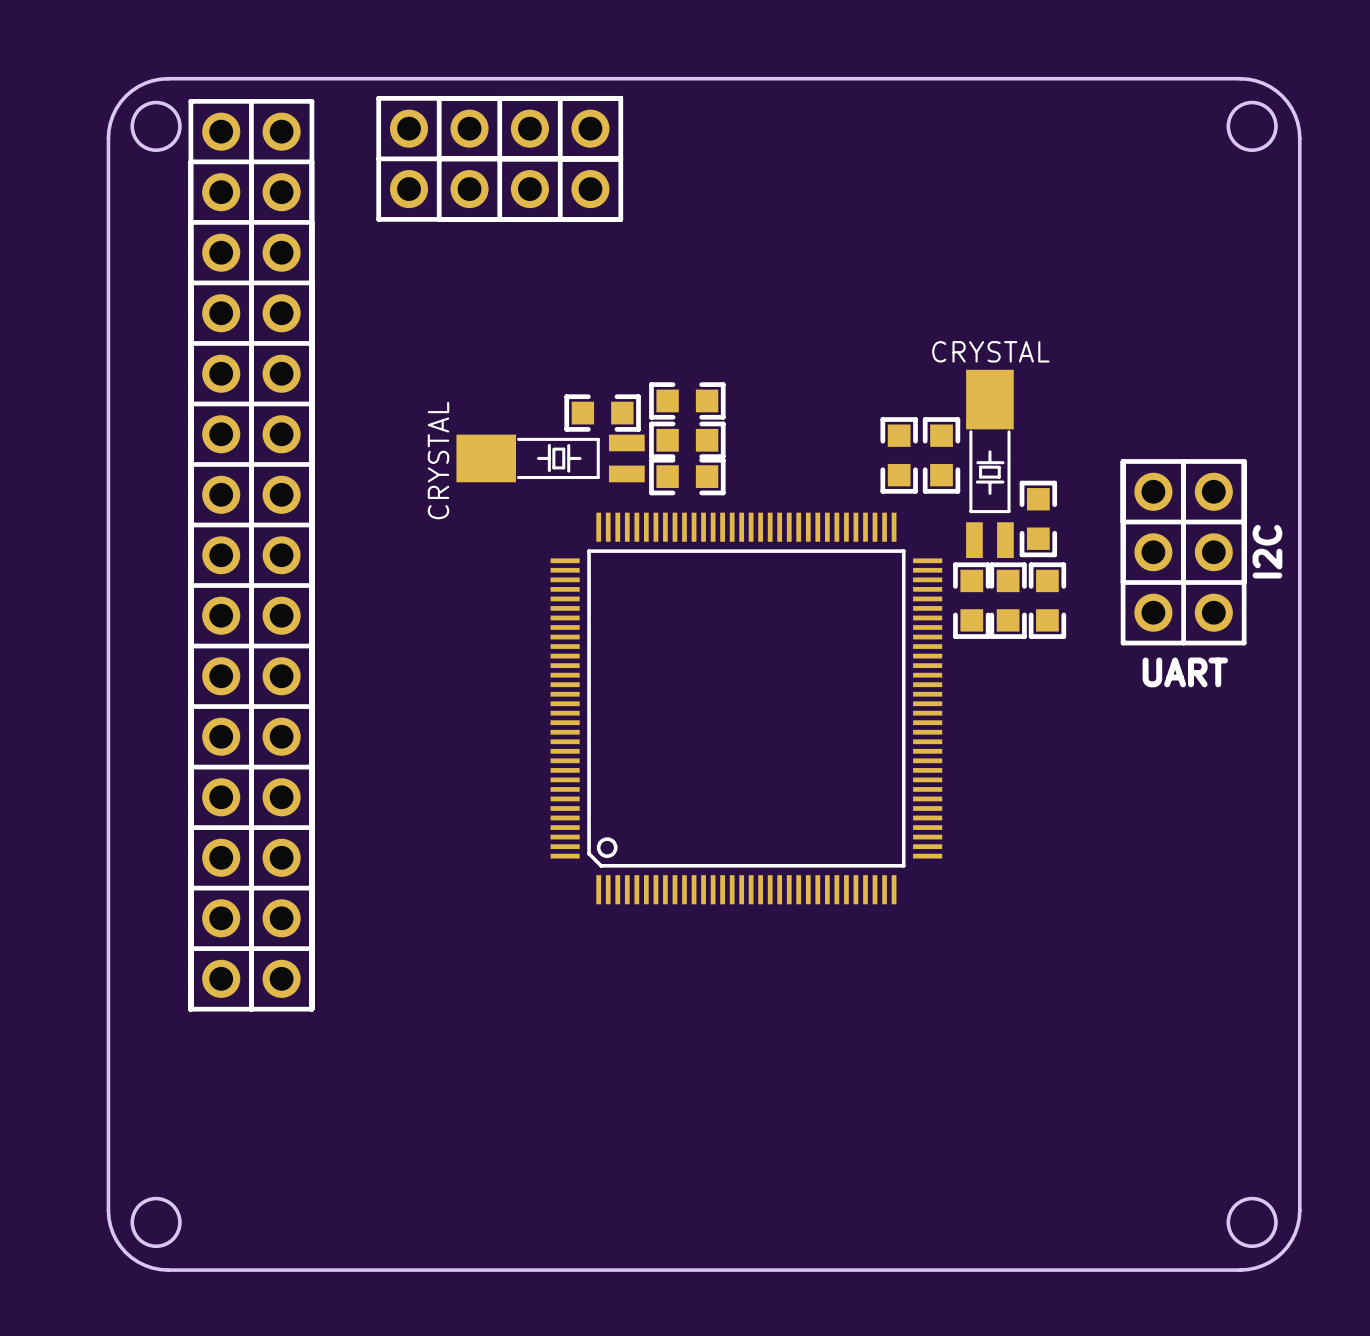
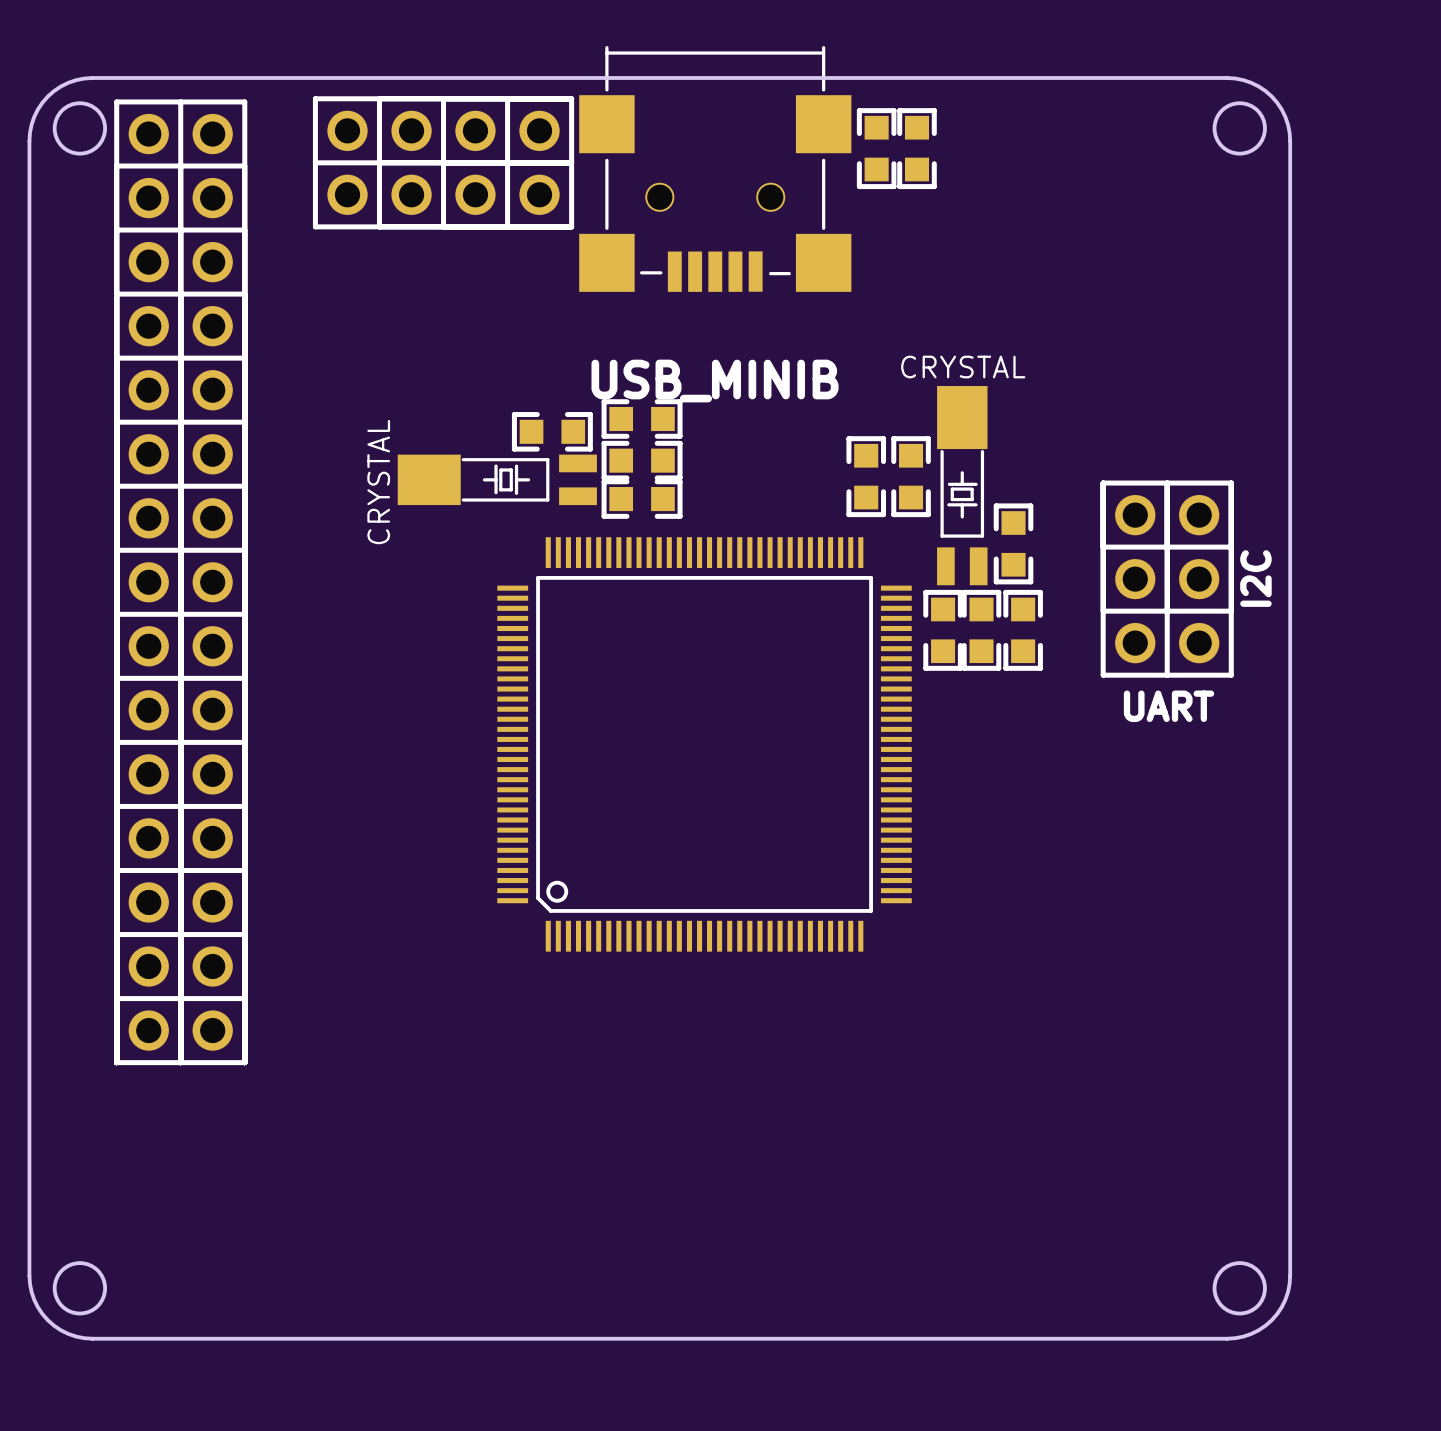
part: none -> (876, 148)
part: none -> (917, 148)
part: none -> USB_MINIB (715, 168)

